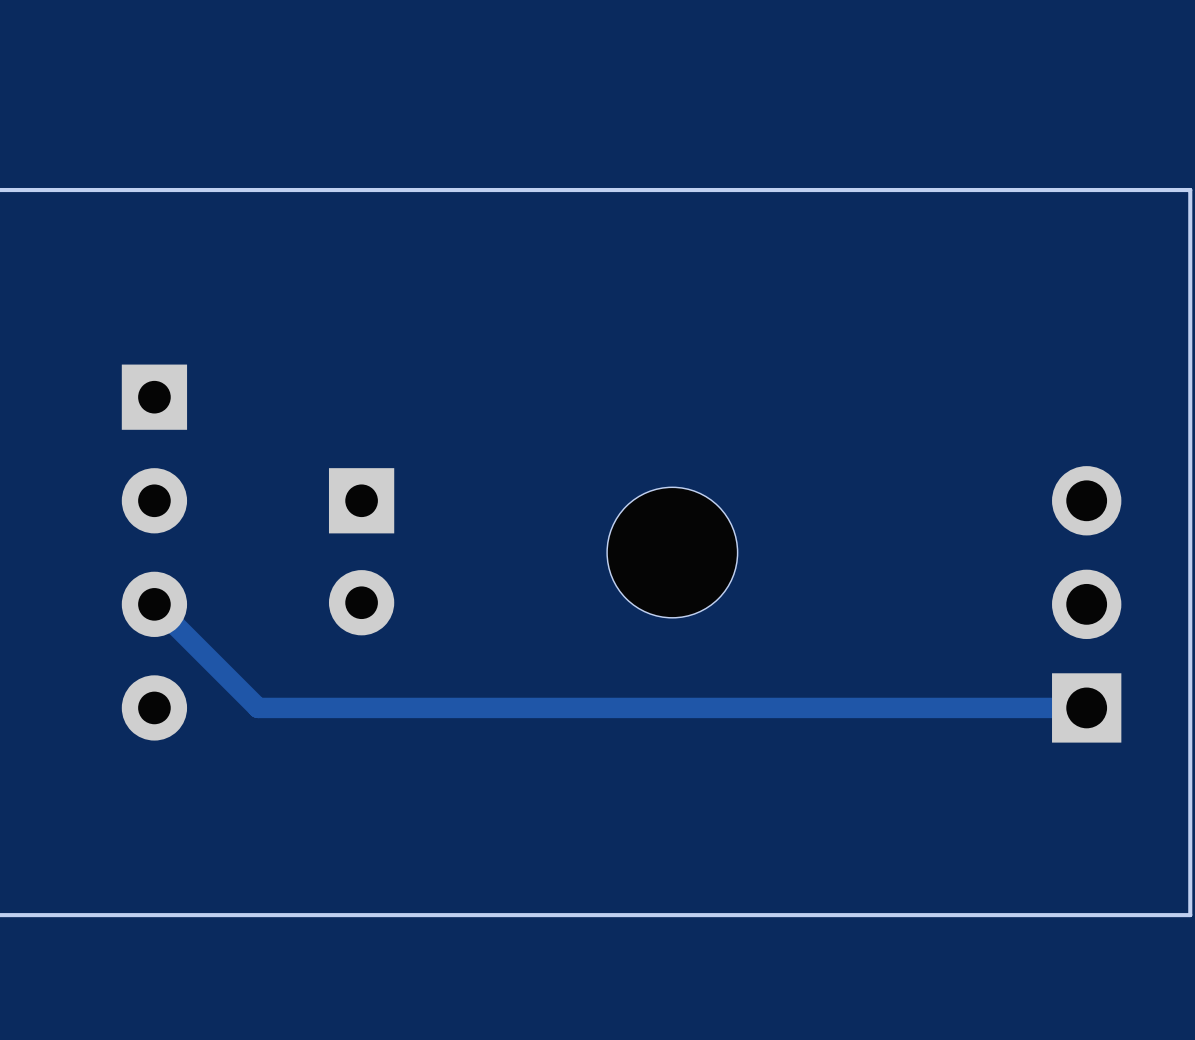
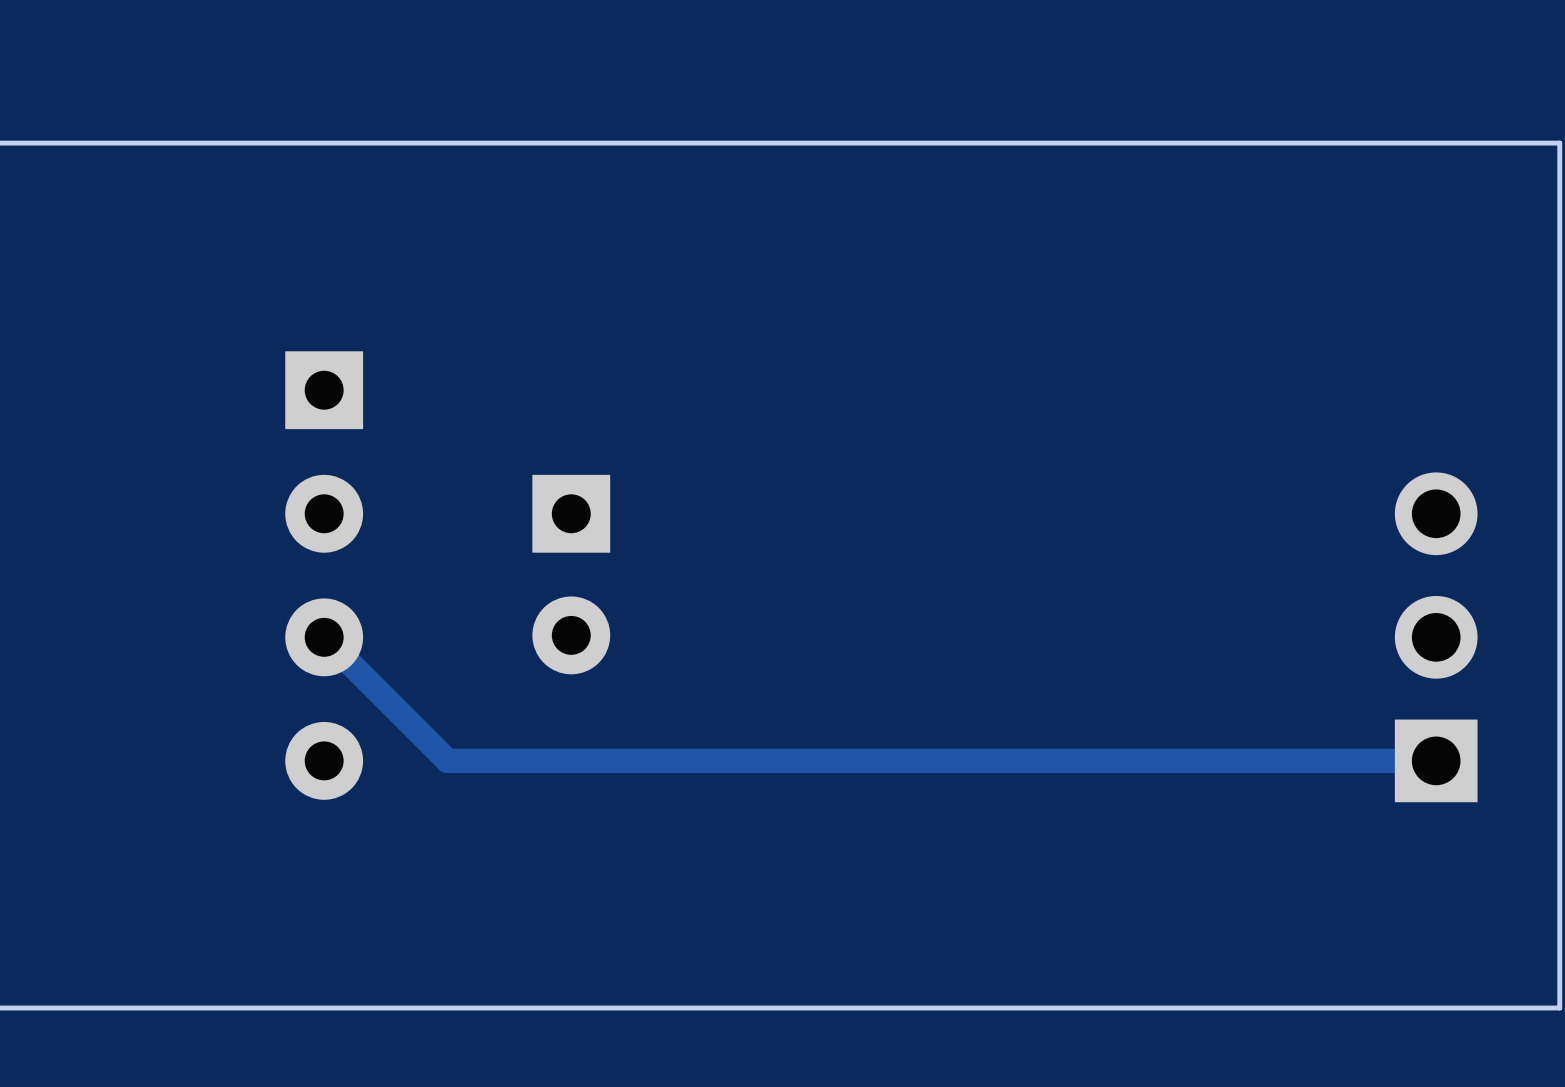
part: (672, 552) -> none

